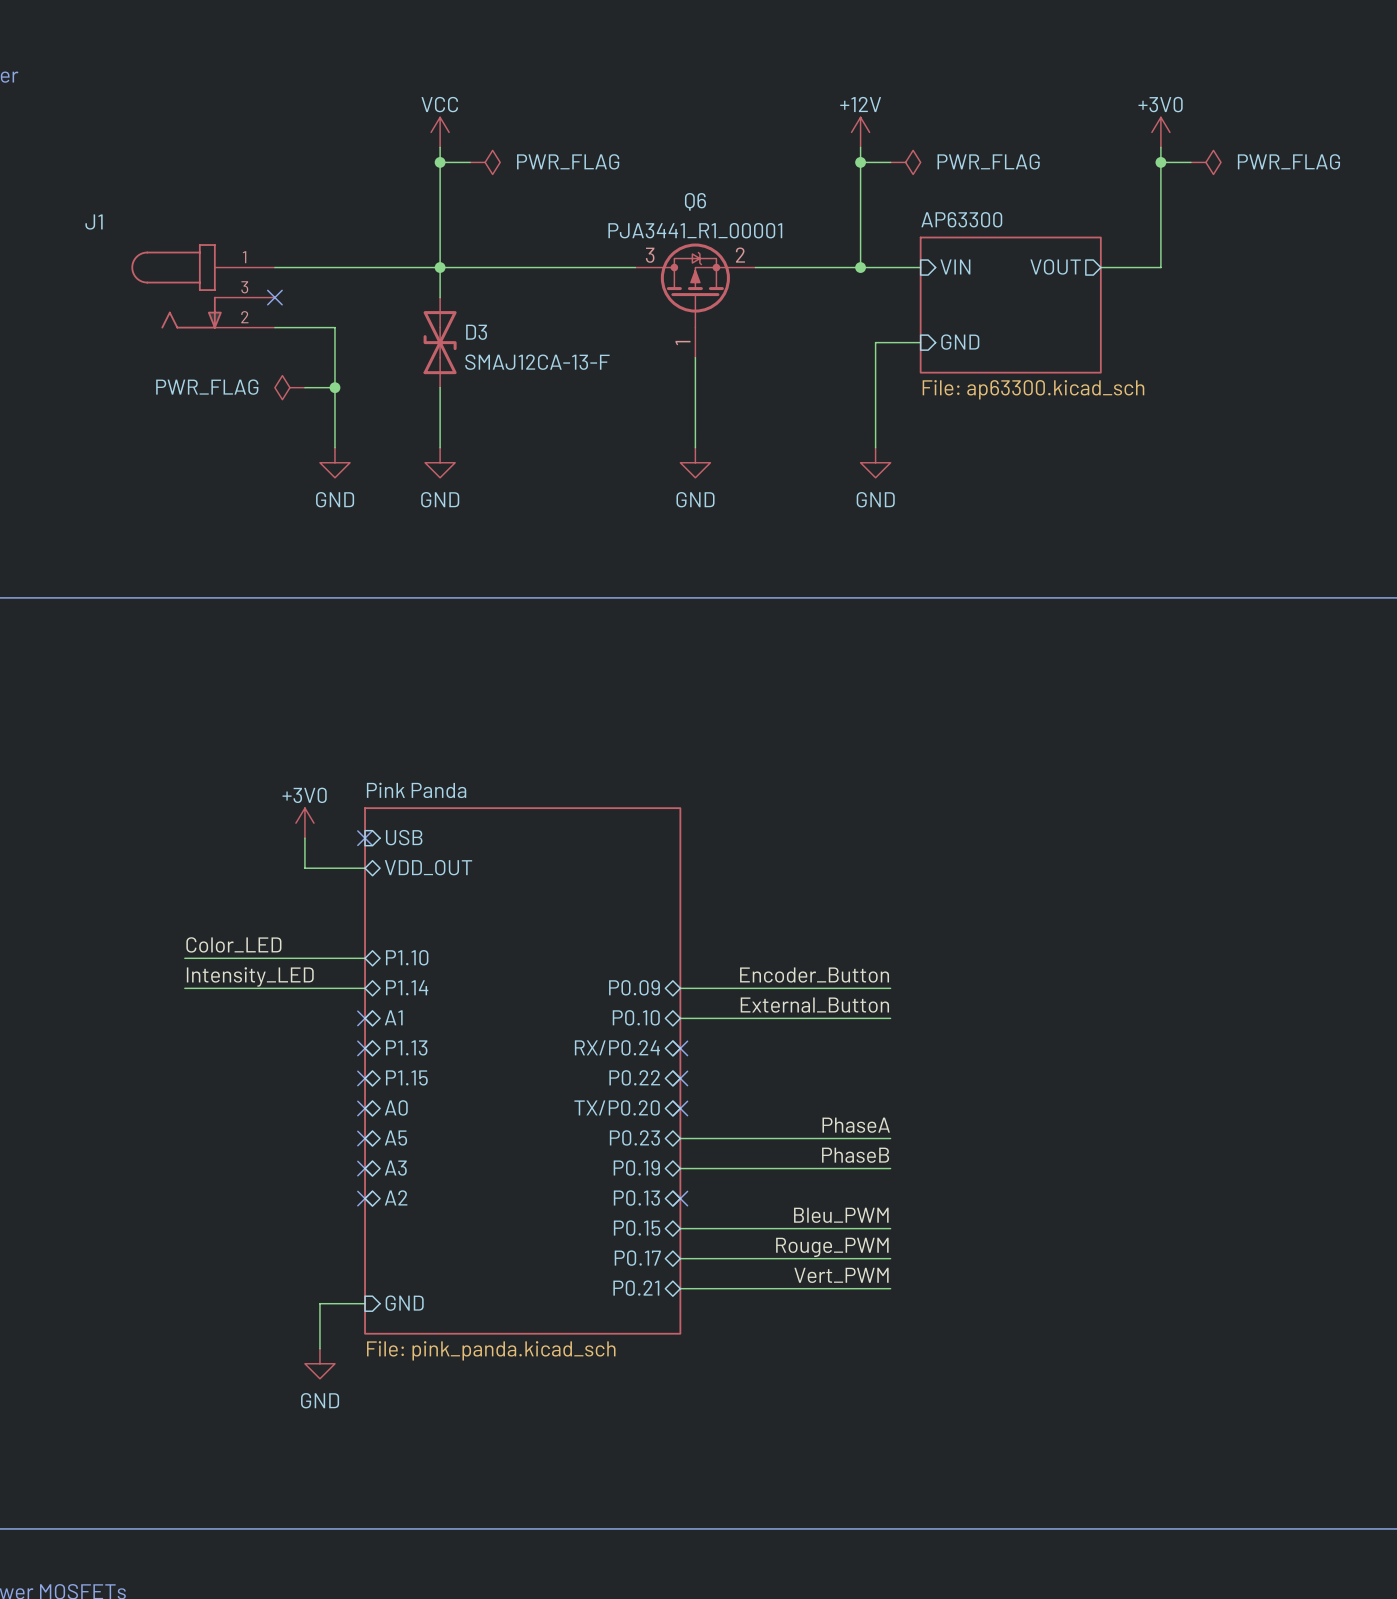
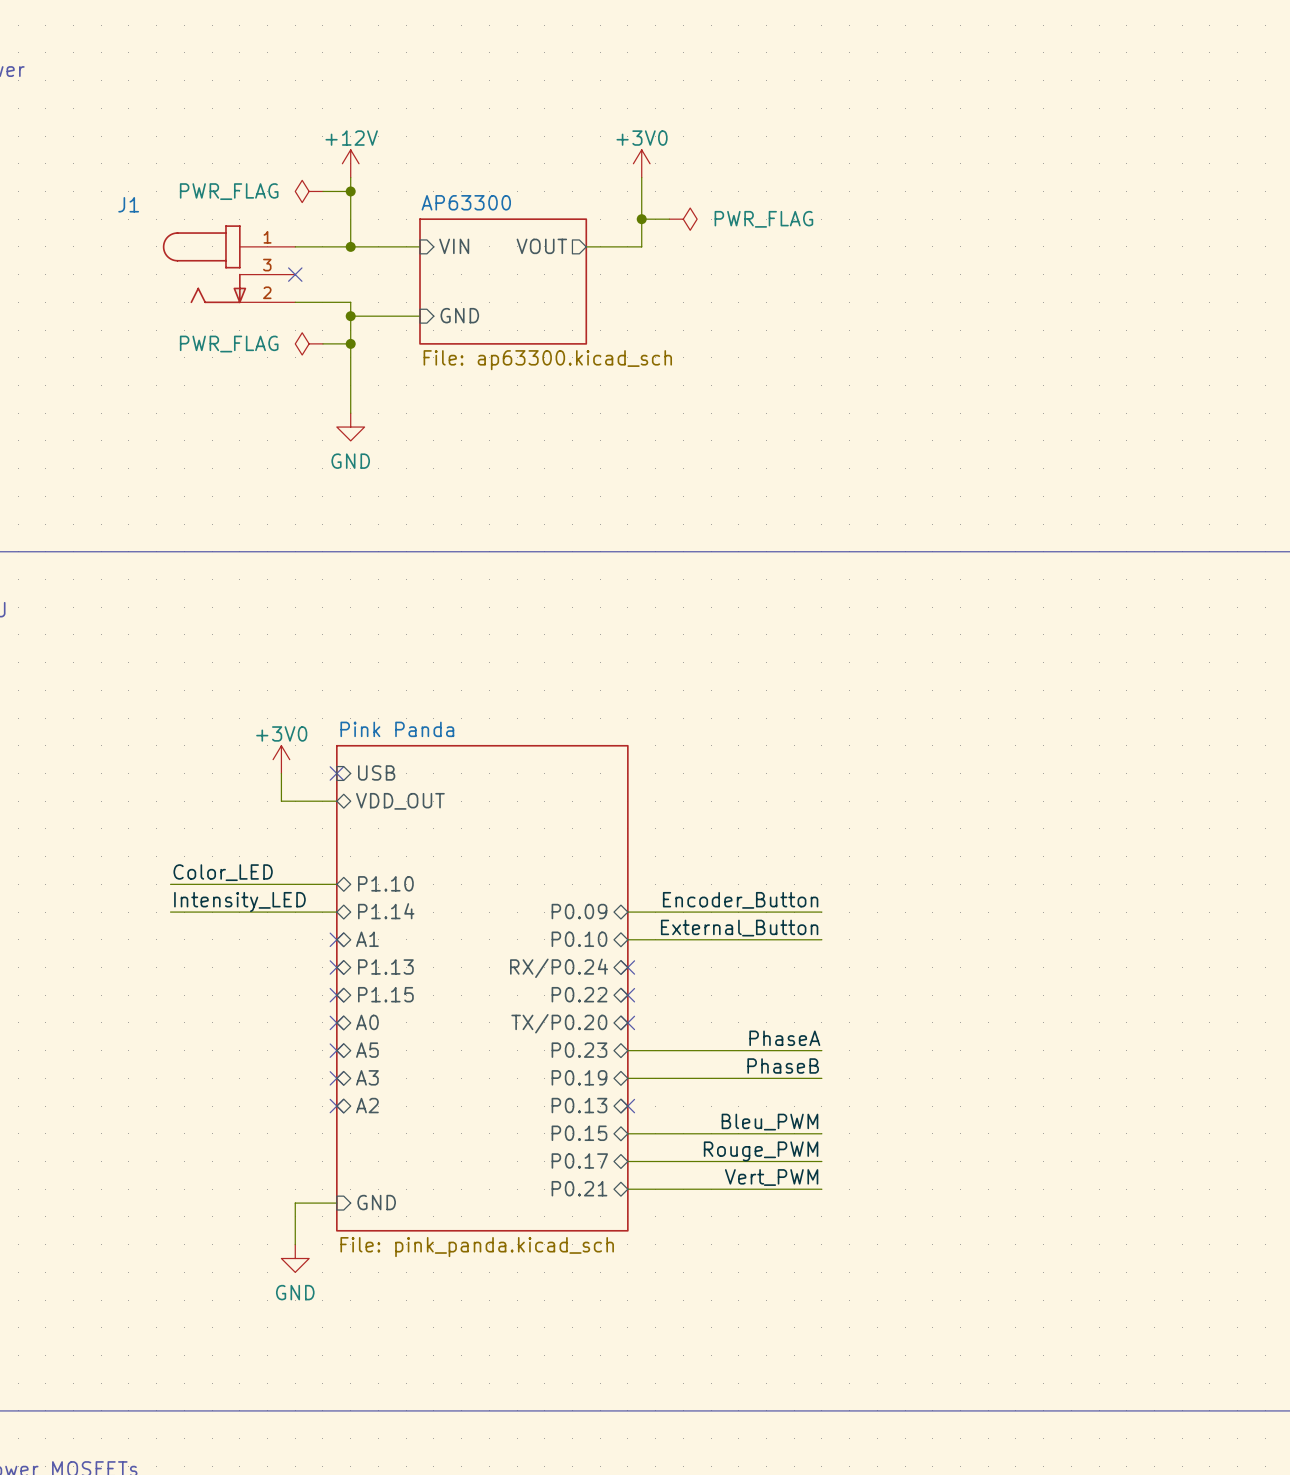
power symbol: VCC (440, 132) -> none
power symbol: +12V (860, 132) -> none
power symbol: +3V0 (1160, 132) -> none
wire: (440, 147) (440, 297) -> none
wire: (860, 147) (860, 267) -> none
wire: (1160, 147) (1160, 267) (1100, 267) -> none
wire: (440, 162) (470, 162) -> (322, 191) (350, 191)
junction: (440, 162) -> none
power symbol: PWR_FLAG (485, 162) -> none
wire: (860, 162) (890, 162) -> (641, 219) (669, 219)
junction: (860, 162) -> none
power symbol: PWR_FLAG (905, 162) -> none
wire: (1160, 162) (1190, 162) -> none
junction: (1160, 162) -> none
power symbol: PWR_FLAG (1205, 162) -> none
power symbol: none -> +12V (350, 163)
power symbol: none -> +3V0 (641, 163)
wire: none -> (350, 177) (350, 246)
power symbol: none -> PWR_FLAG (309, 191)
junction: none -> (350, 191)
junction: none -> (641, 219)
power symbol: none -> PWR_FLAG (683, 219)
sheet pin: none -> VIN (454, 246)
sheet pin: none -> VOUT (541, 246)
sheet pin: VIN (955, 266) -> none
sheet pin: VOUT (1055, 266) -> none
junction: none -> (350, 246)
junction: (440, 267) -> none
wire: (455, 267) (635, 267) -> (641, 177) (641, 246) (586, 246)
wire: (755, 267) (920, 267) -> none
junction: (860, 267) -> none
J1 position: (203, 286) -> (229, 264)
no-connect mark position: (274, 297) -> (295, 274)
Q6: PJA3441_R1_00001 (695, 300) -> none
sheet AP63300 position: (1010, 305) -> (503, 281)
wire: (334, 327) (334, 447) -> (309, 302) (350, 302) (350, 413)
wire: none -> (350, 316) (419, 316)
junction: none -> (350, 316)
D3: SMAJ12CA-13-F (440, 342) -> none
sheet pin: none -> GND (459, 315)
wire: (920, 342) (875, 342) (875, 447) -> none
sheet pin: GND (960, 342) -> none
wire: (695, 357) (695, 447) -> none
junction: none -> (350, 343)
power symbol position: PWR_FLAG (289, 387) -> PWR_FLAG (309, 343)
wire: (304, 387) (334, 387) -> (322, 343) (350, 343)
junction: (334, 387) -> none
wire: (440, 387) (440, 447) -> none
power symbol: GND (334, 462) -> none
power symbol: none -> GND (350, 427)
power symbol: GND (440, 462) -> none
power symbol: GND (695, 462) -> none
power symbol: GND (875, 462) -> none

